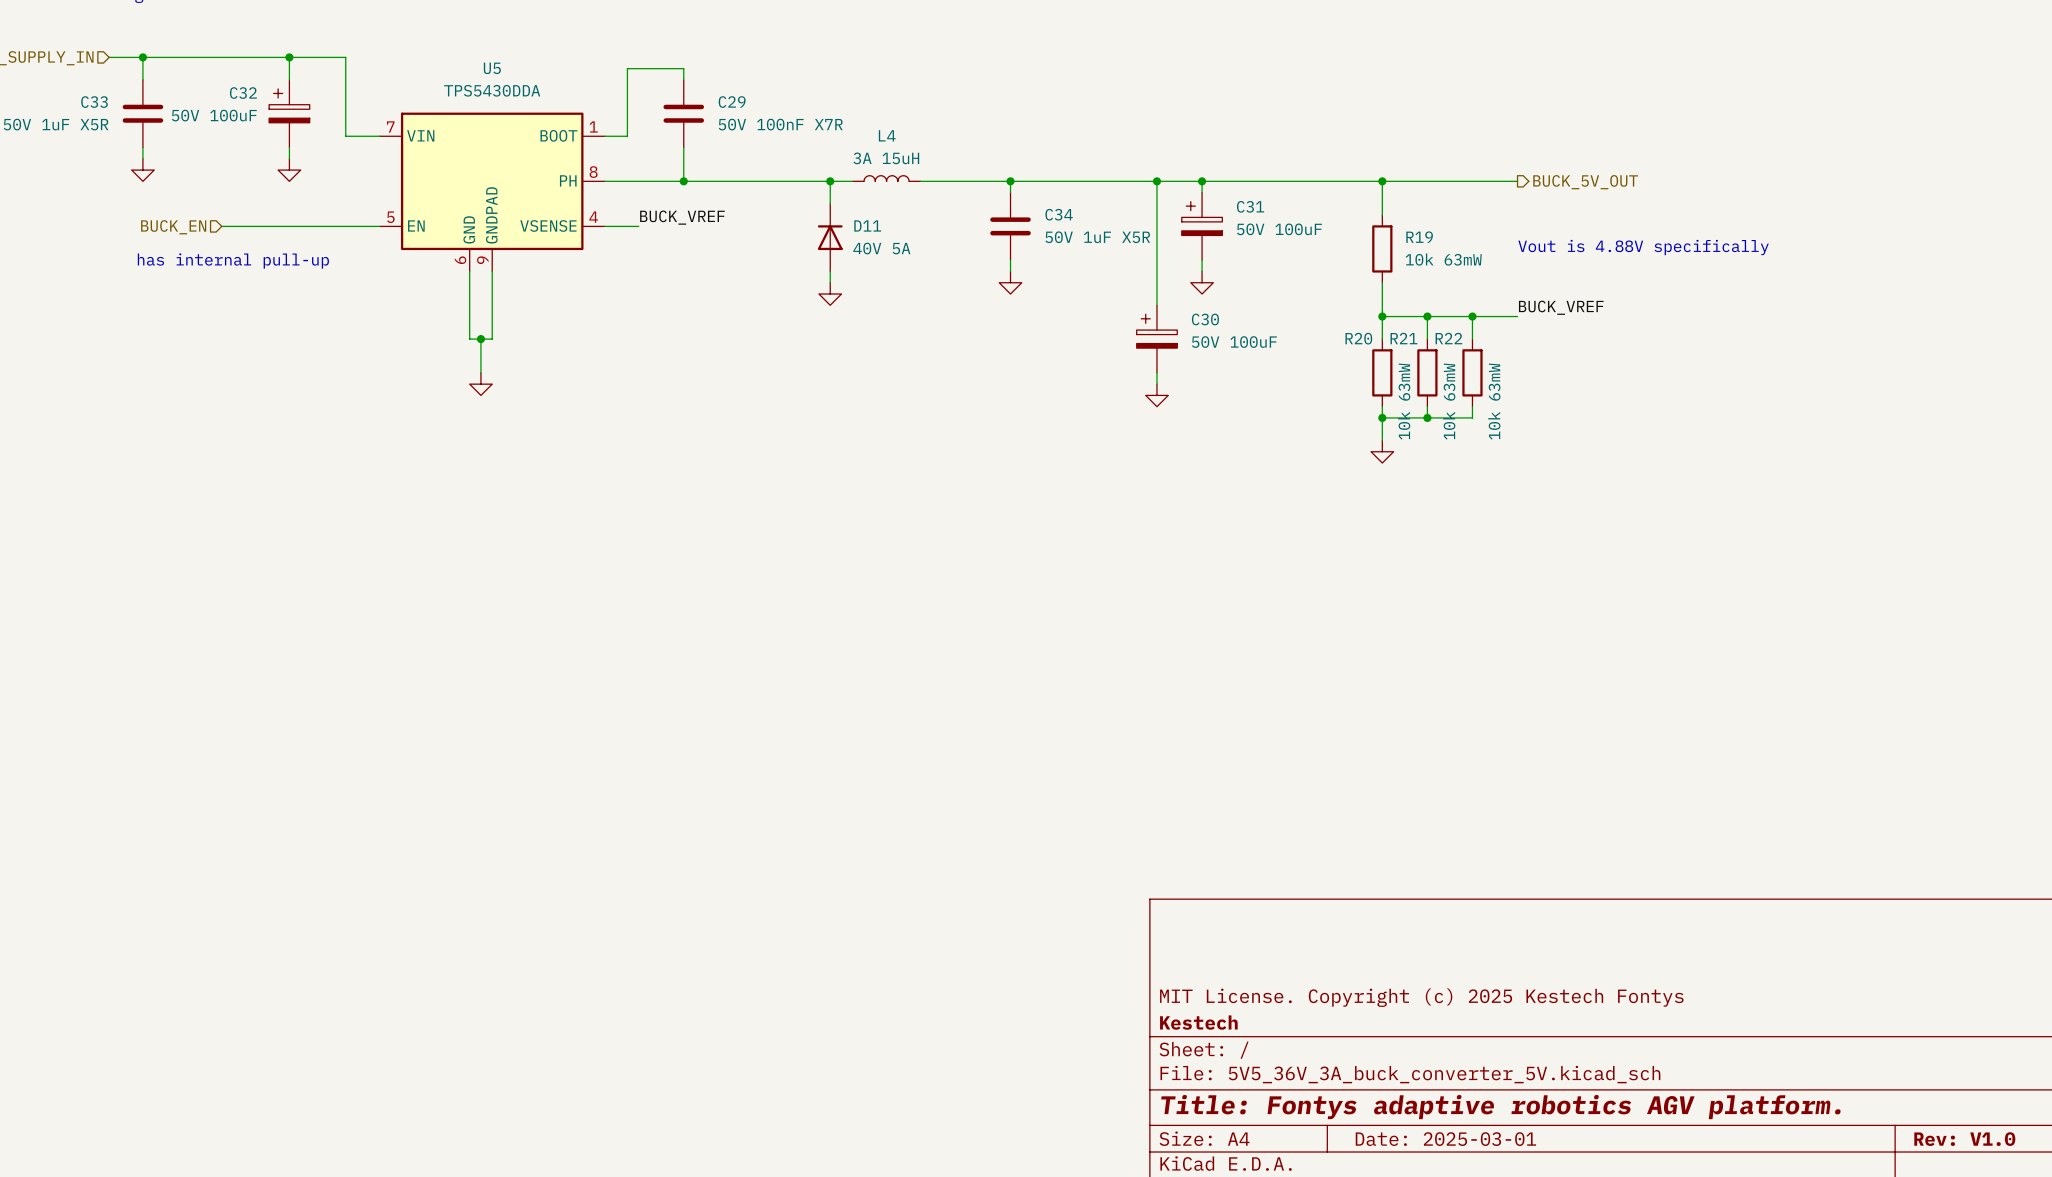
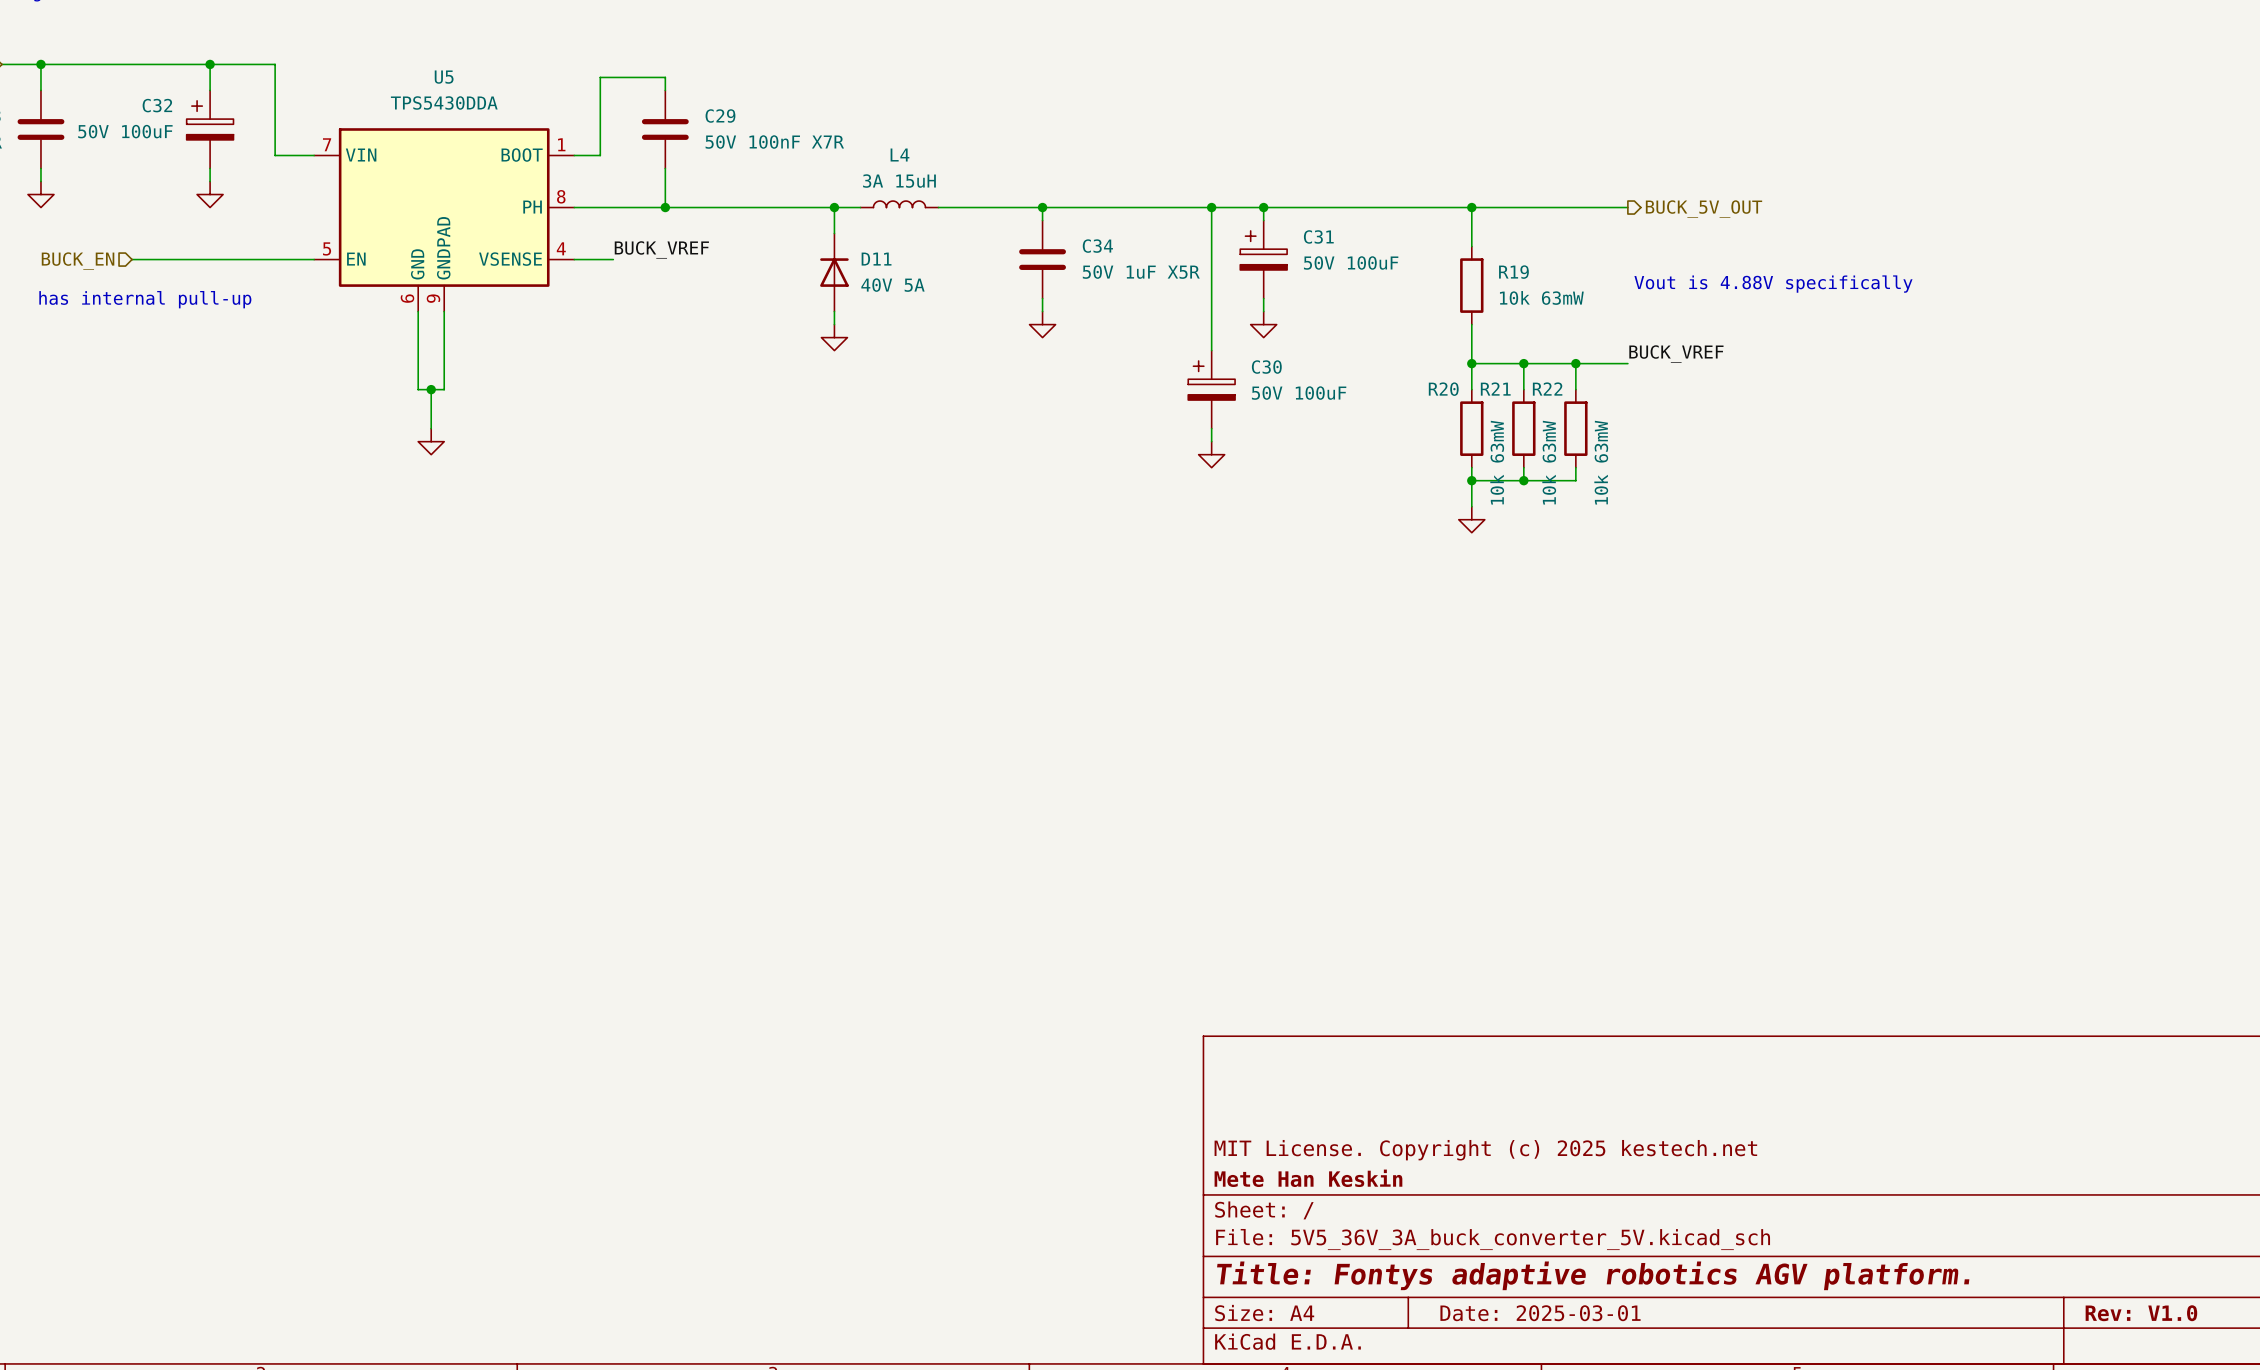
title block: MIT License. Copyright (c) 2025 Kestech Fontys (1421, 997) -> MIT License. Copyright (c) 2025 kestech.net (1485, 1150)
title block: Kestech (1198, 1022) -> Mete Han Keskin (1308, 1178)

